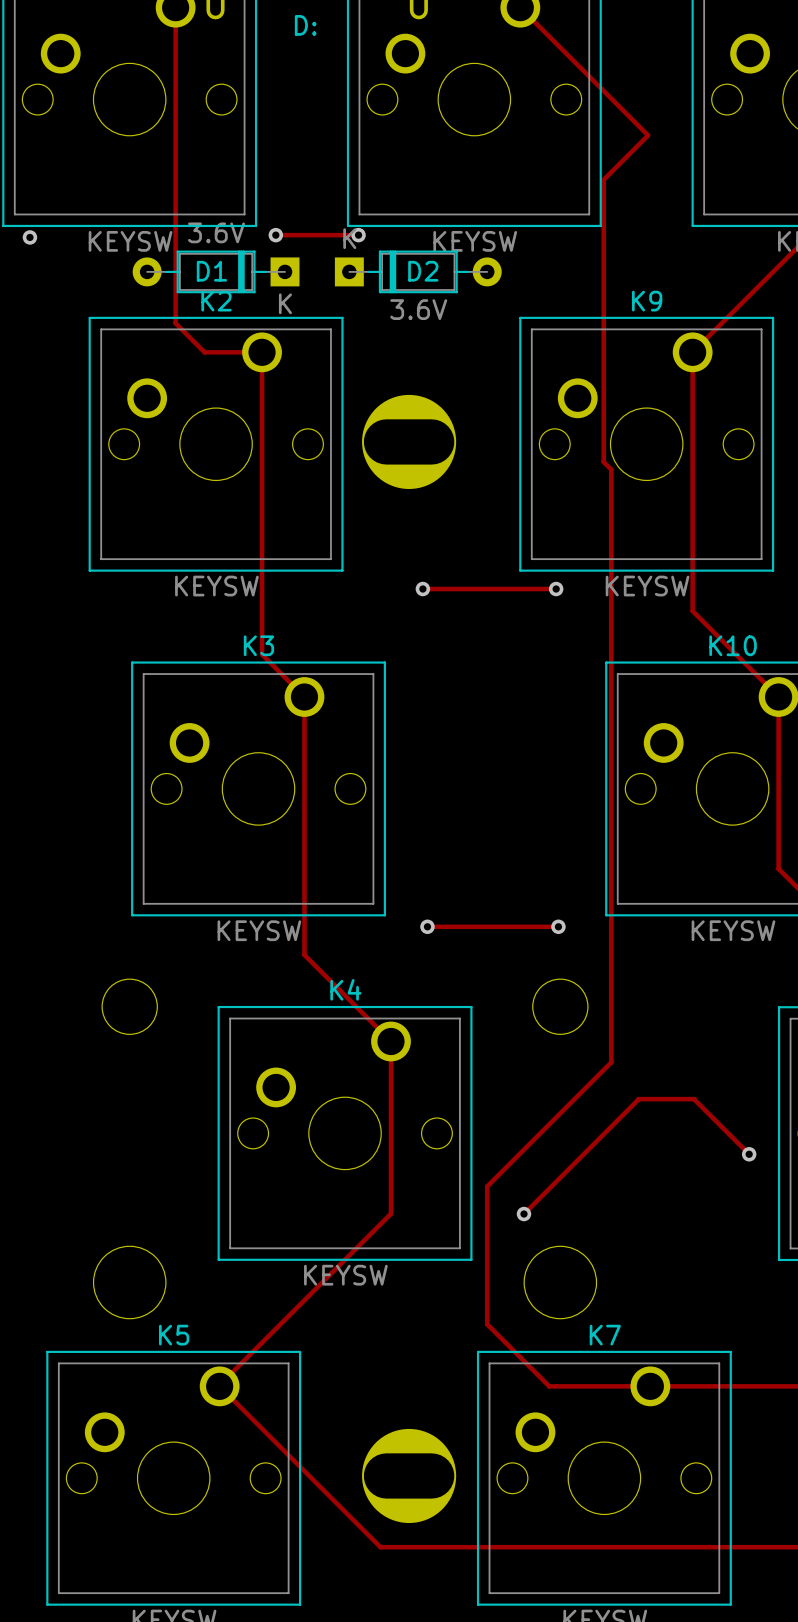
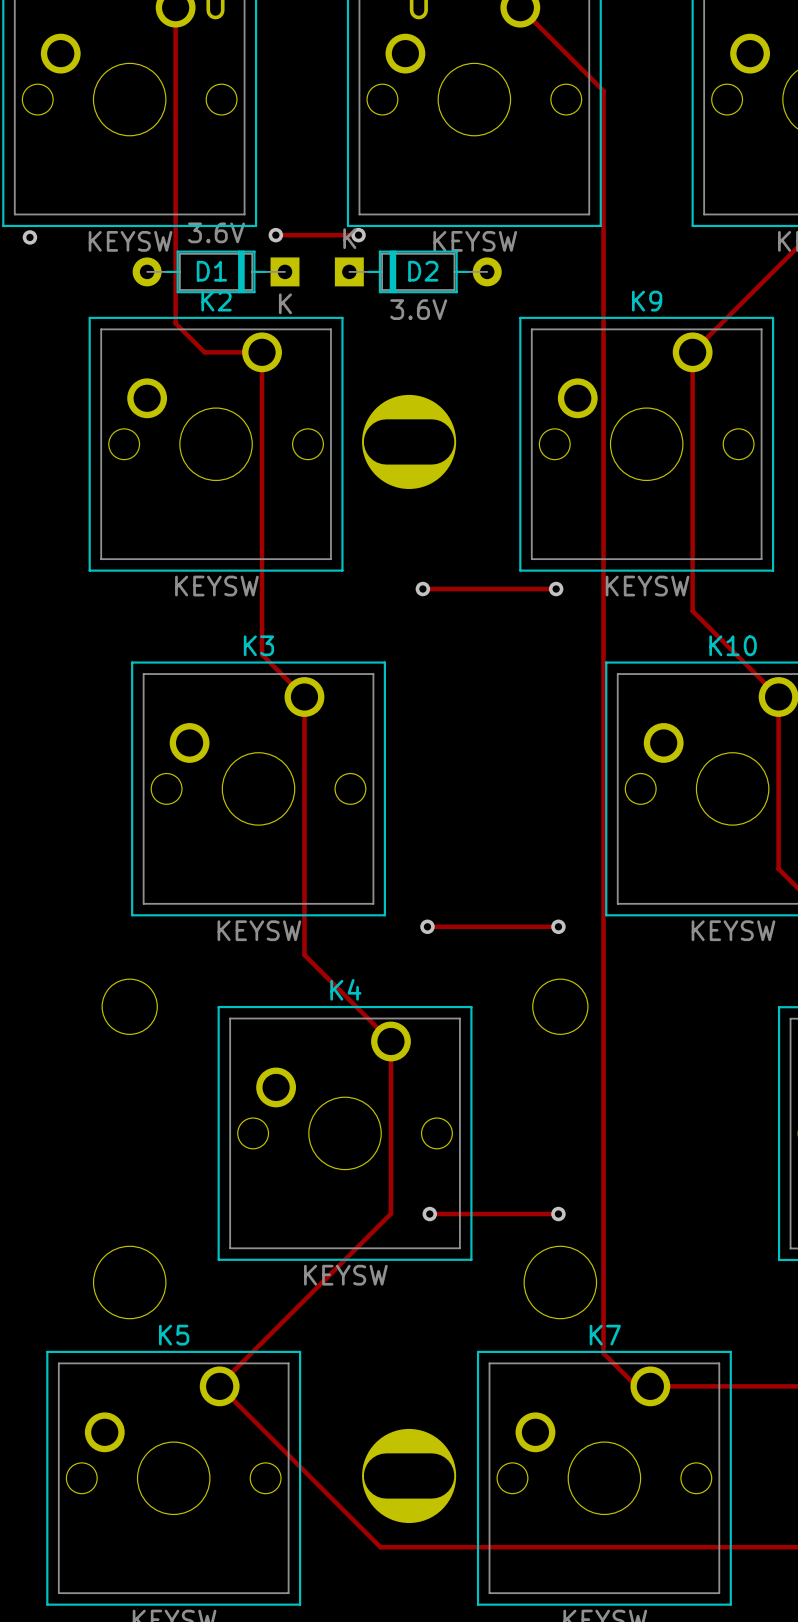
text: D: (305, 25) -> none
track: (603, 90) (648, 135) (603, 179) (603, 462) (611, 469) (611, 1062) (487, 1186) (487, 1324) (549, 1386) (636, 1386) -> (603, 90) (603, 1353) (636, 1386)
track: (749, 1154) (694, 1099) (638, 1099) (523, 1214) -> none
via: (749, 1154) -> none
track: none -> (429, 1214) (558, 1214)
via: none -> (429, 1214)
via position: (523, 1214) -> (558, 1214)

